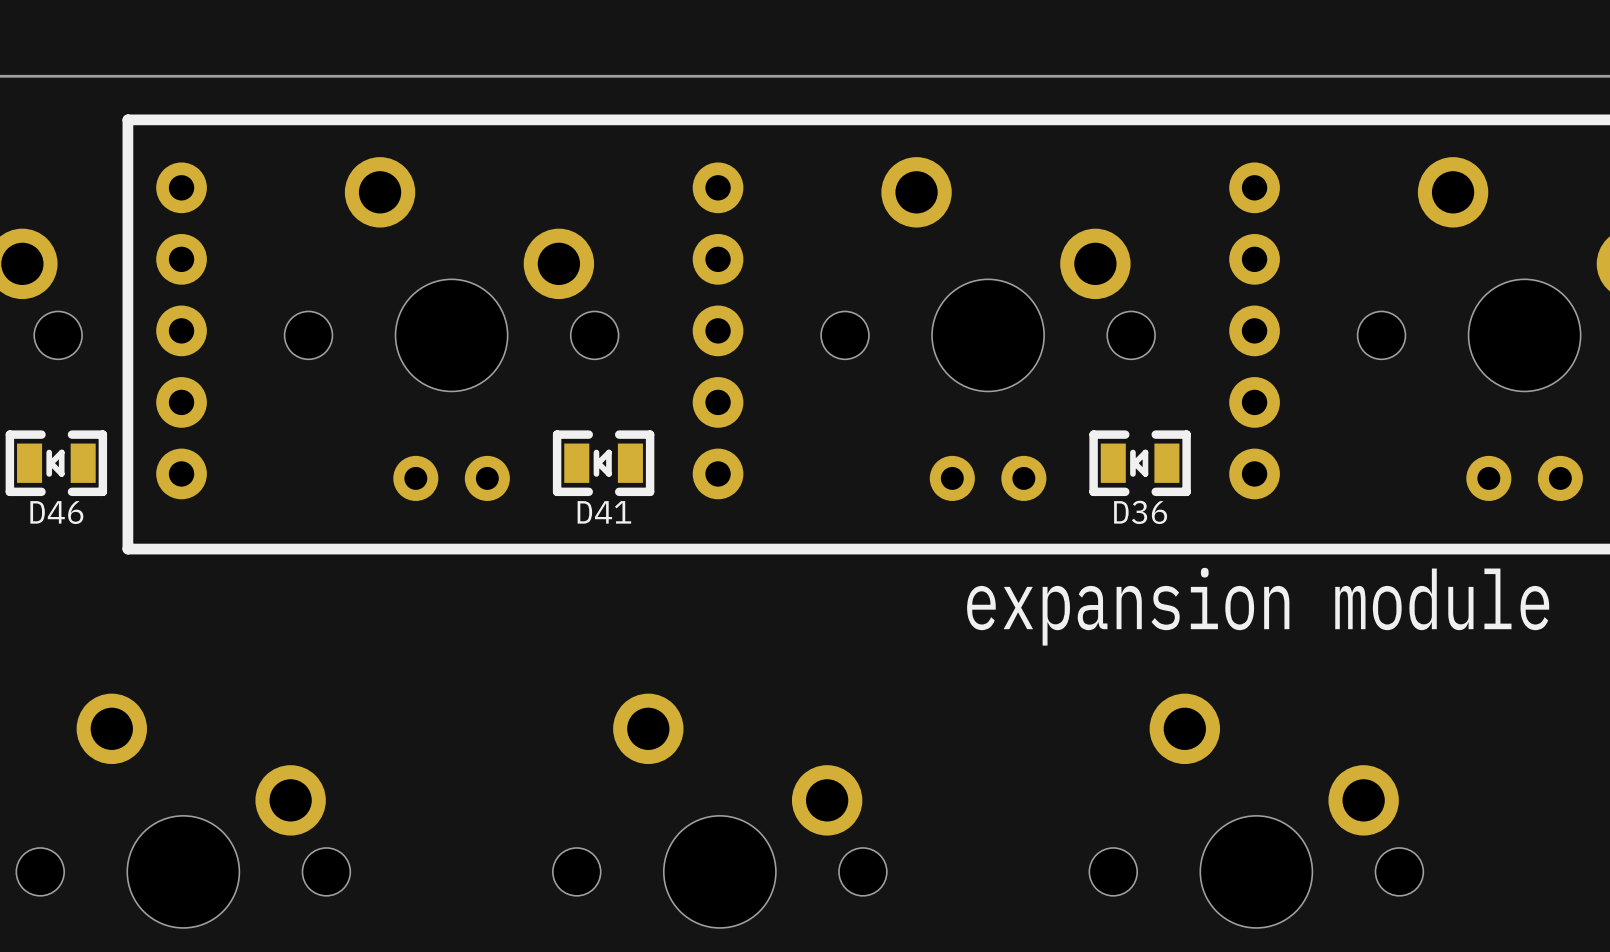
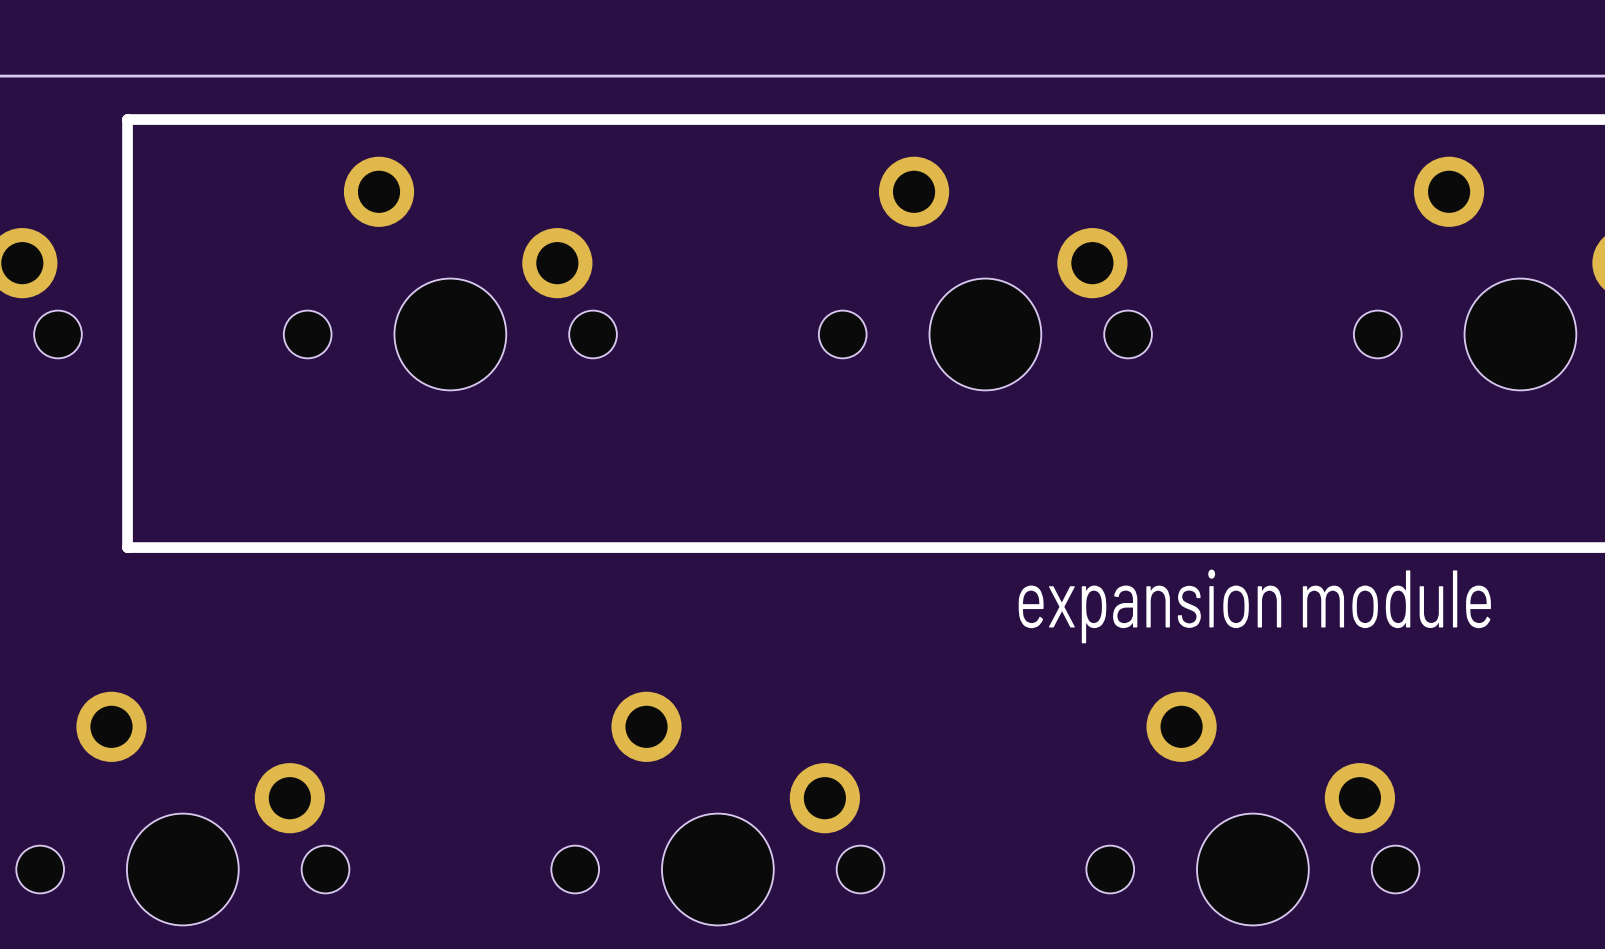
part: (181, 187) -> none
part: (718, 187) -> none
part: (1254, 187) -> none
part: (181, 259) -> none
part: (718, 259) -> none
part: (1254, 259) -> none
part: (181, 330) -> none
part: (718, 330) -> none
part: (1254, 330) -> none
part: (181, 402) -> none
part: (718, 402) -> none
part: (1254, 402) -> none
D46: (56, 463) -> none
D41: (603, 463) -> none
D36: (1140, 463) -> none
part: (181, 473) -> none
part: (718, 473) -> none
part: (1254, 473) -> none
part: (451, 478) -> none
part: (988, 478) -> none
part: (1524, 478) -> none

